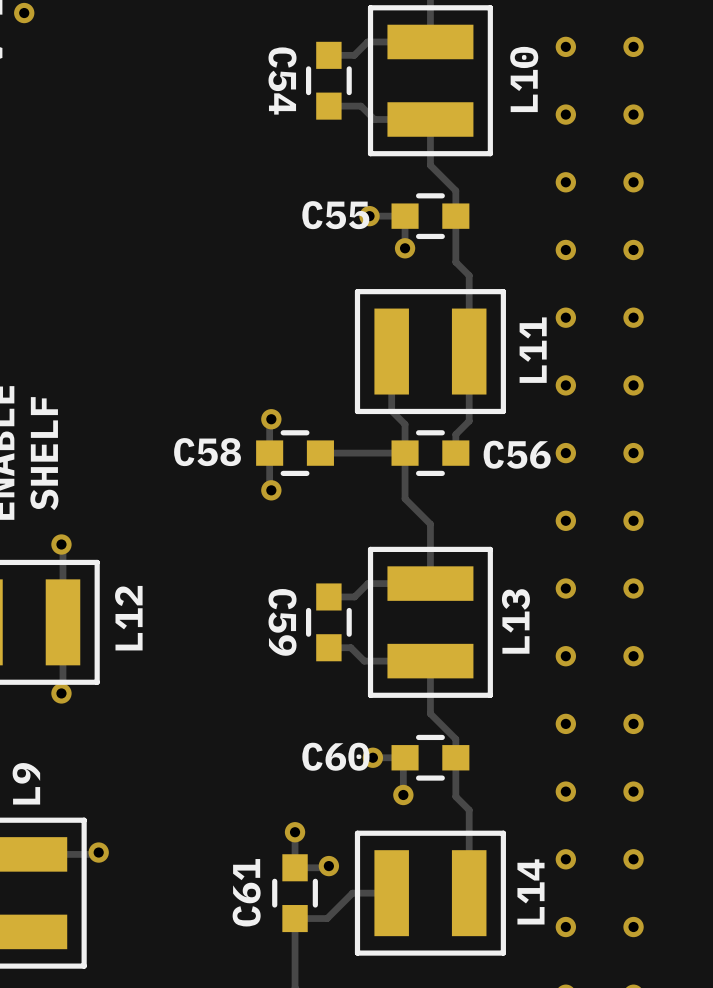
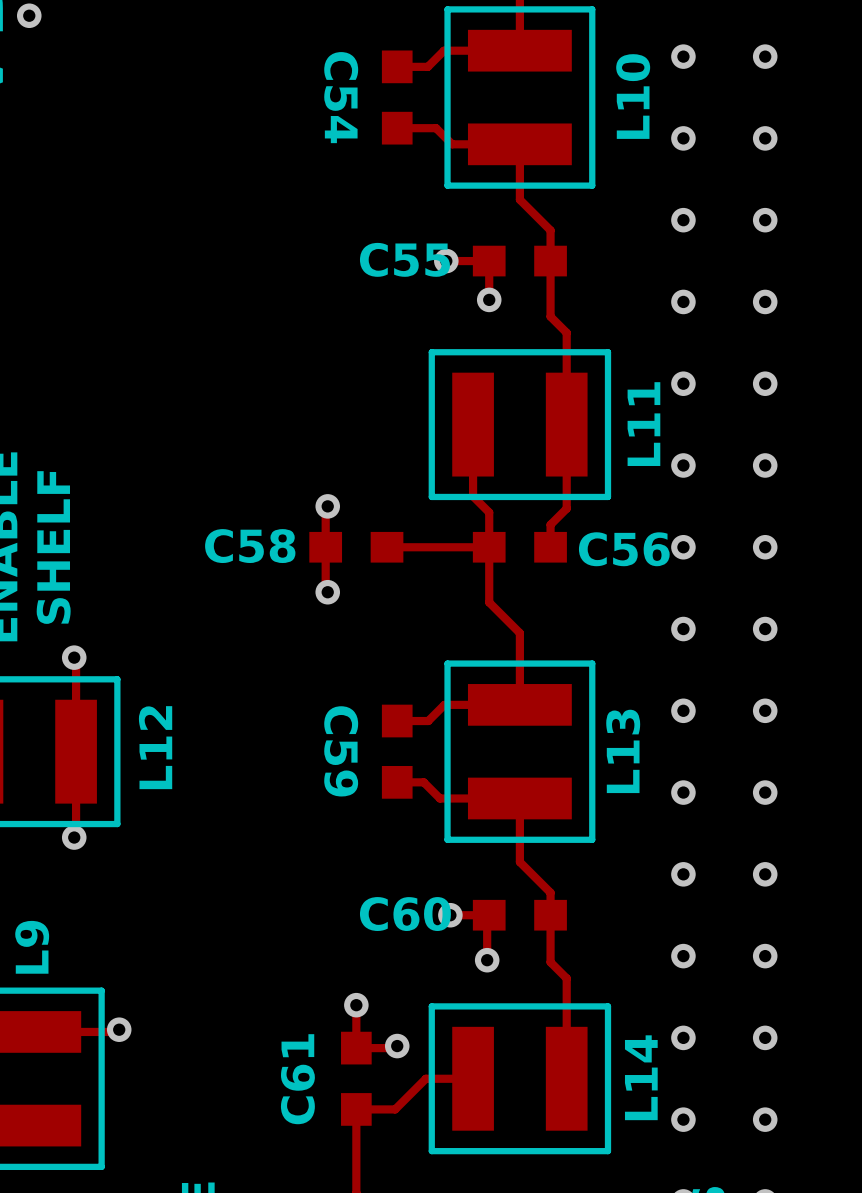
C54 footprint: [305, 41, 352, 120] -> [381, 50, 413, 145]
C55 footprint: [391, 193, 470, 240] -> [472, 245, 567, 277]
C58 footprint: [256, 430, 334, 477] -> [309, 531, 404, 563]
C56 footprint: [391, 430, 470, 477] -> [472, 531, 567, 563]
C59 footprint: [305, 583, 352, 662] -> [381, 704, 413, 799]
C60 footprint: [391, 734, 470, 781] -> [472, 899, 567, 931]
C61 footprint: [272, 854, 318, 933] -> [341, 1031, 372, 1126]

